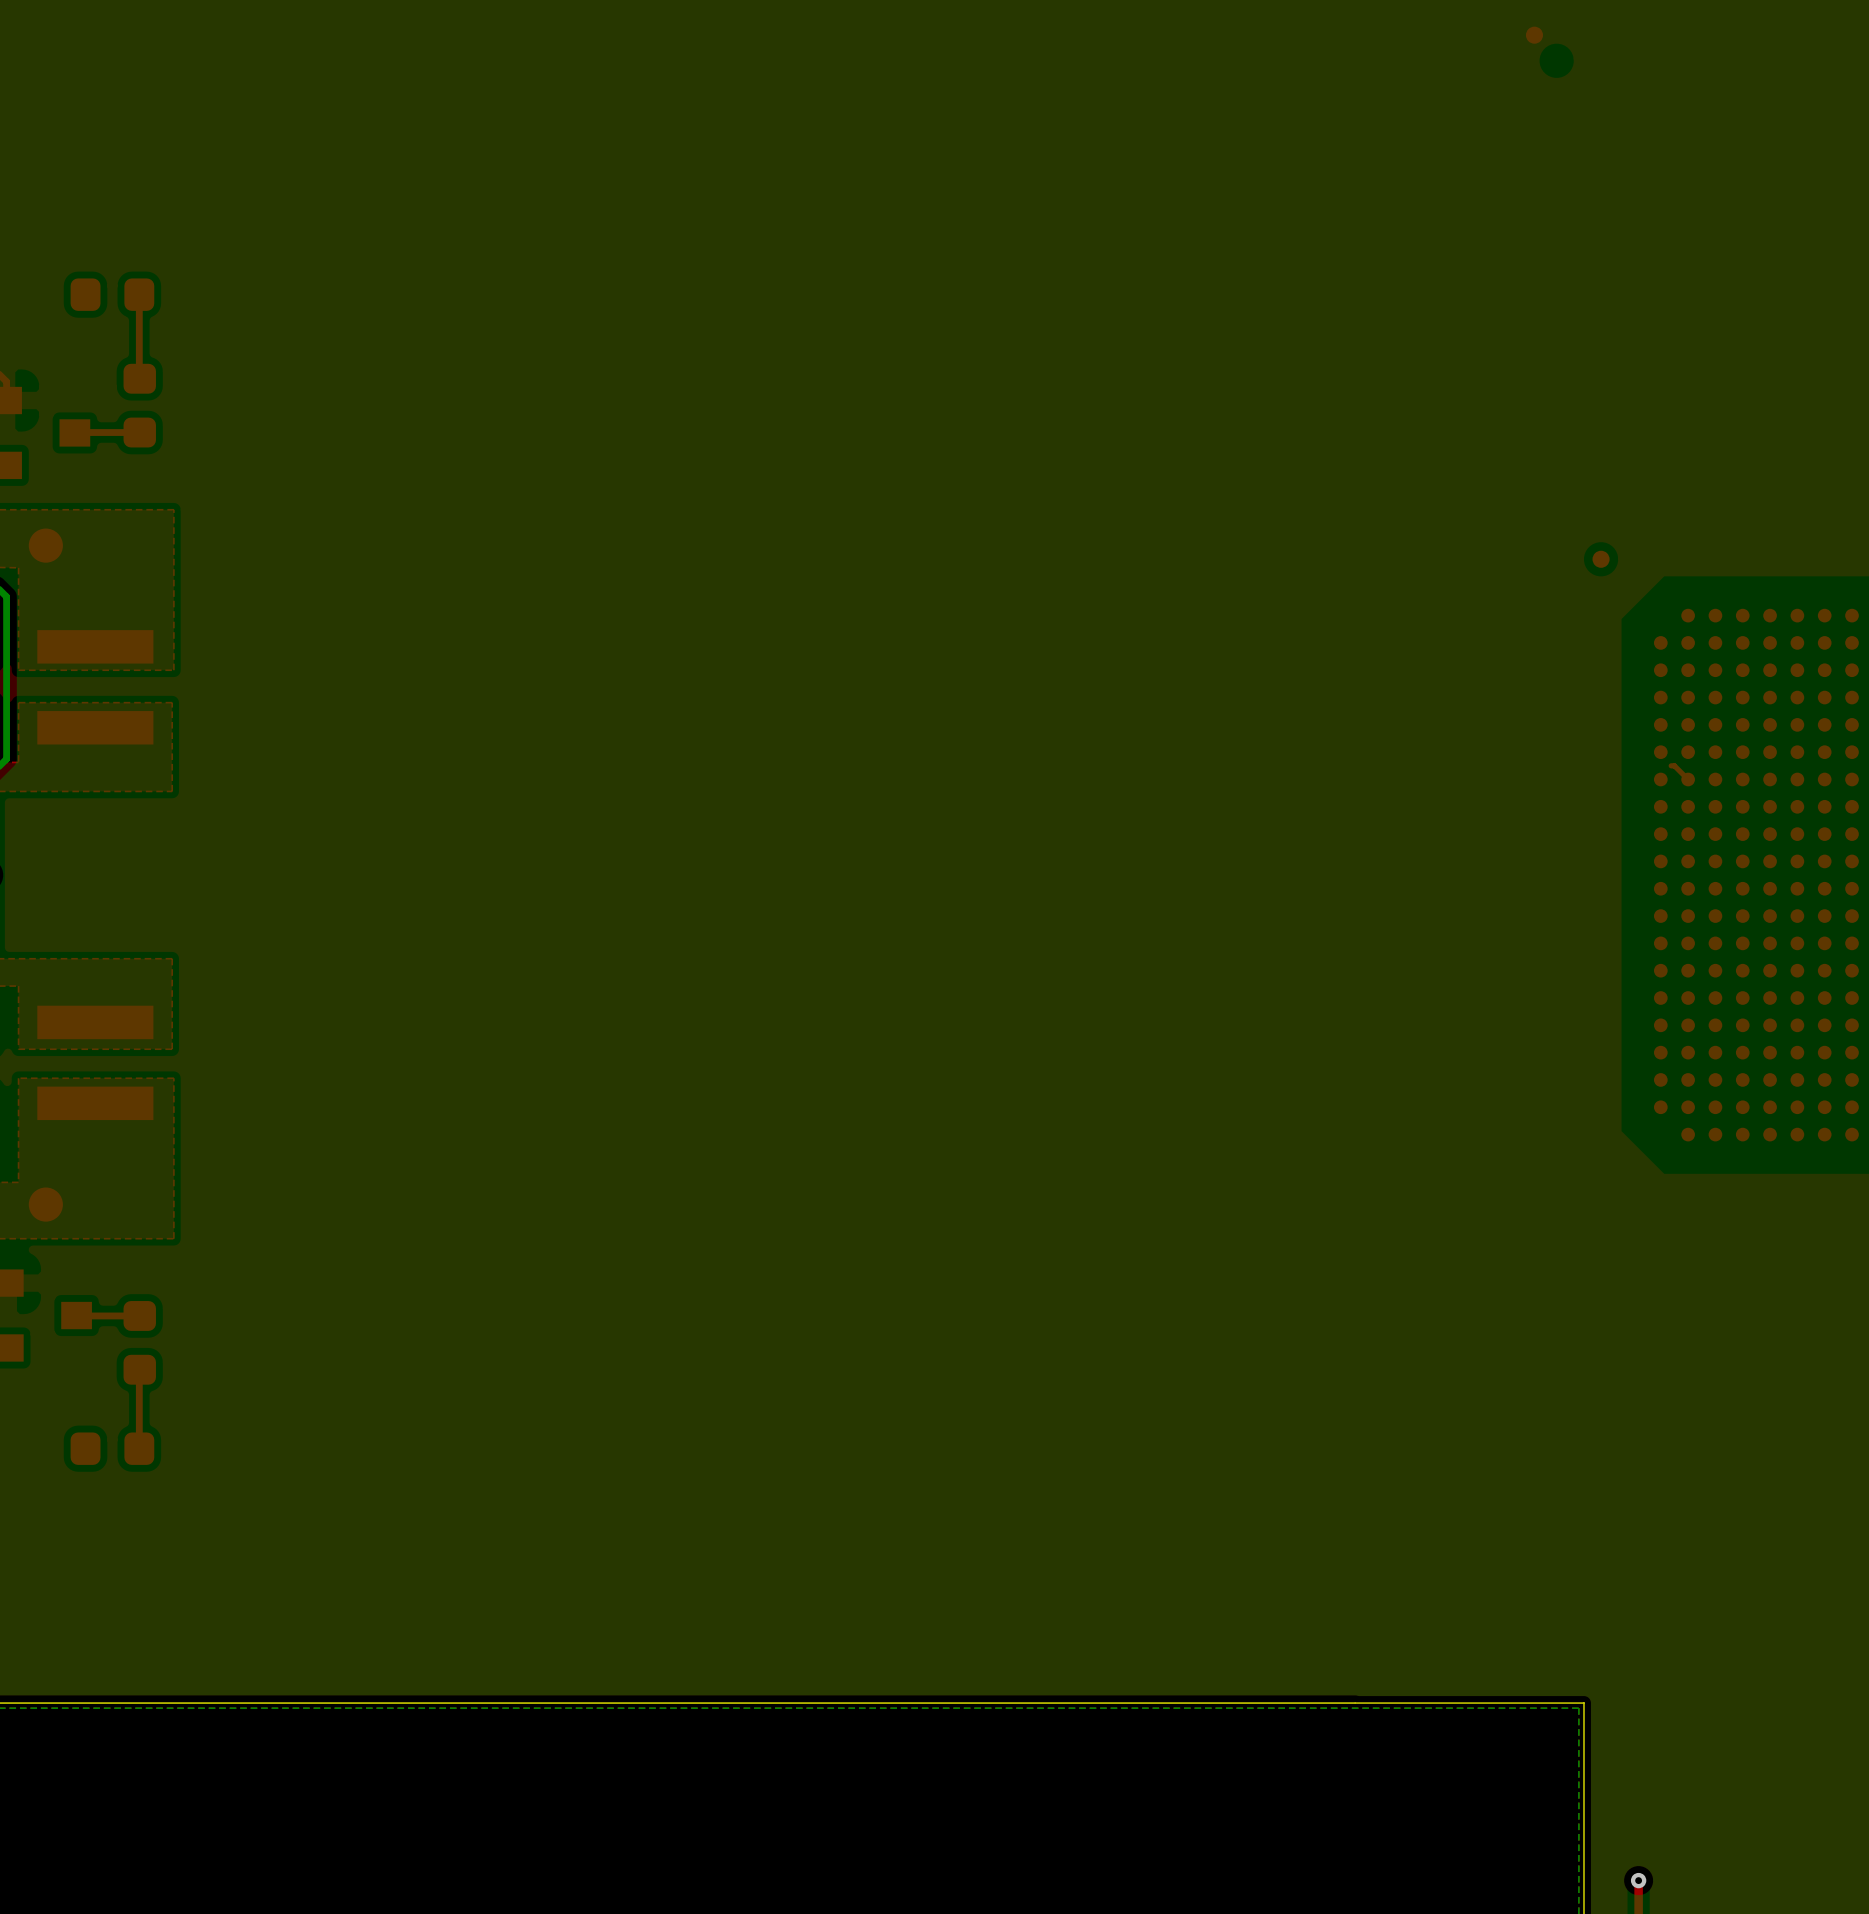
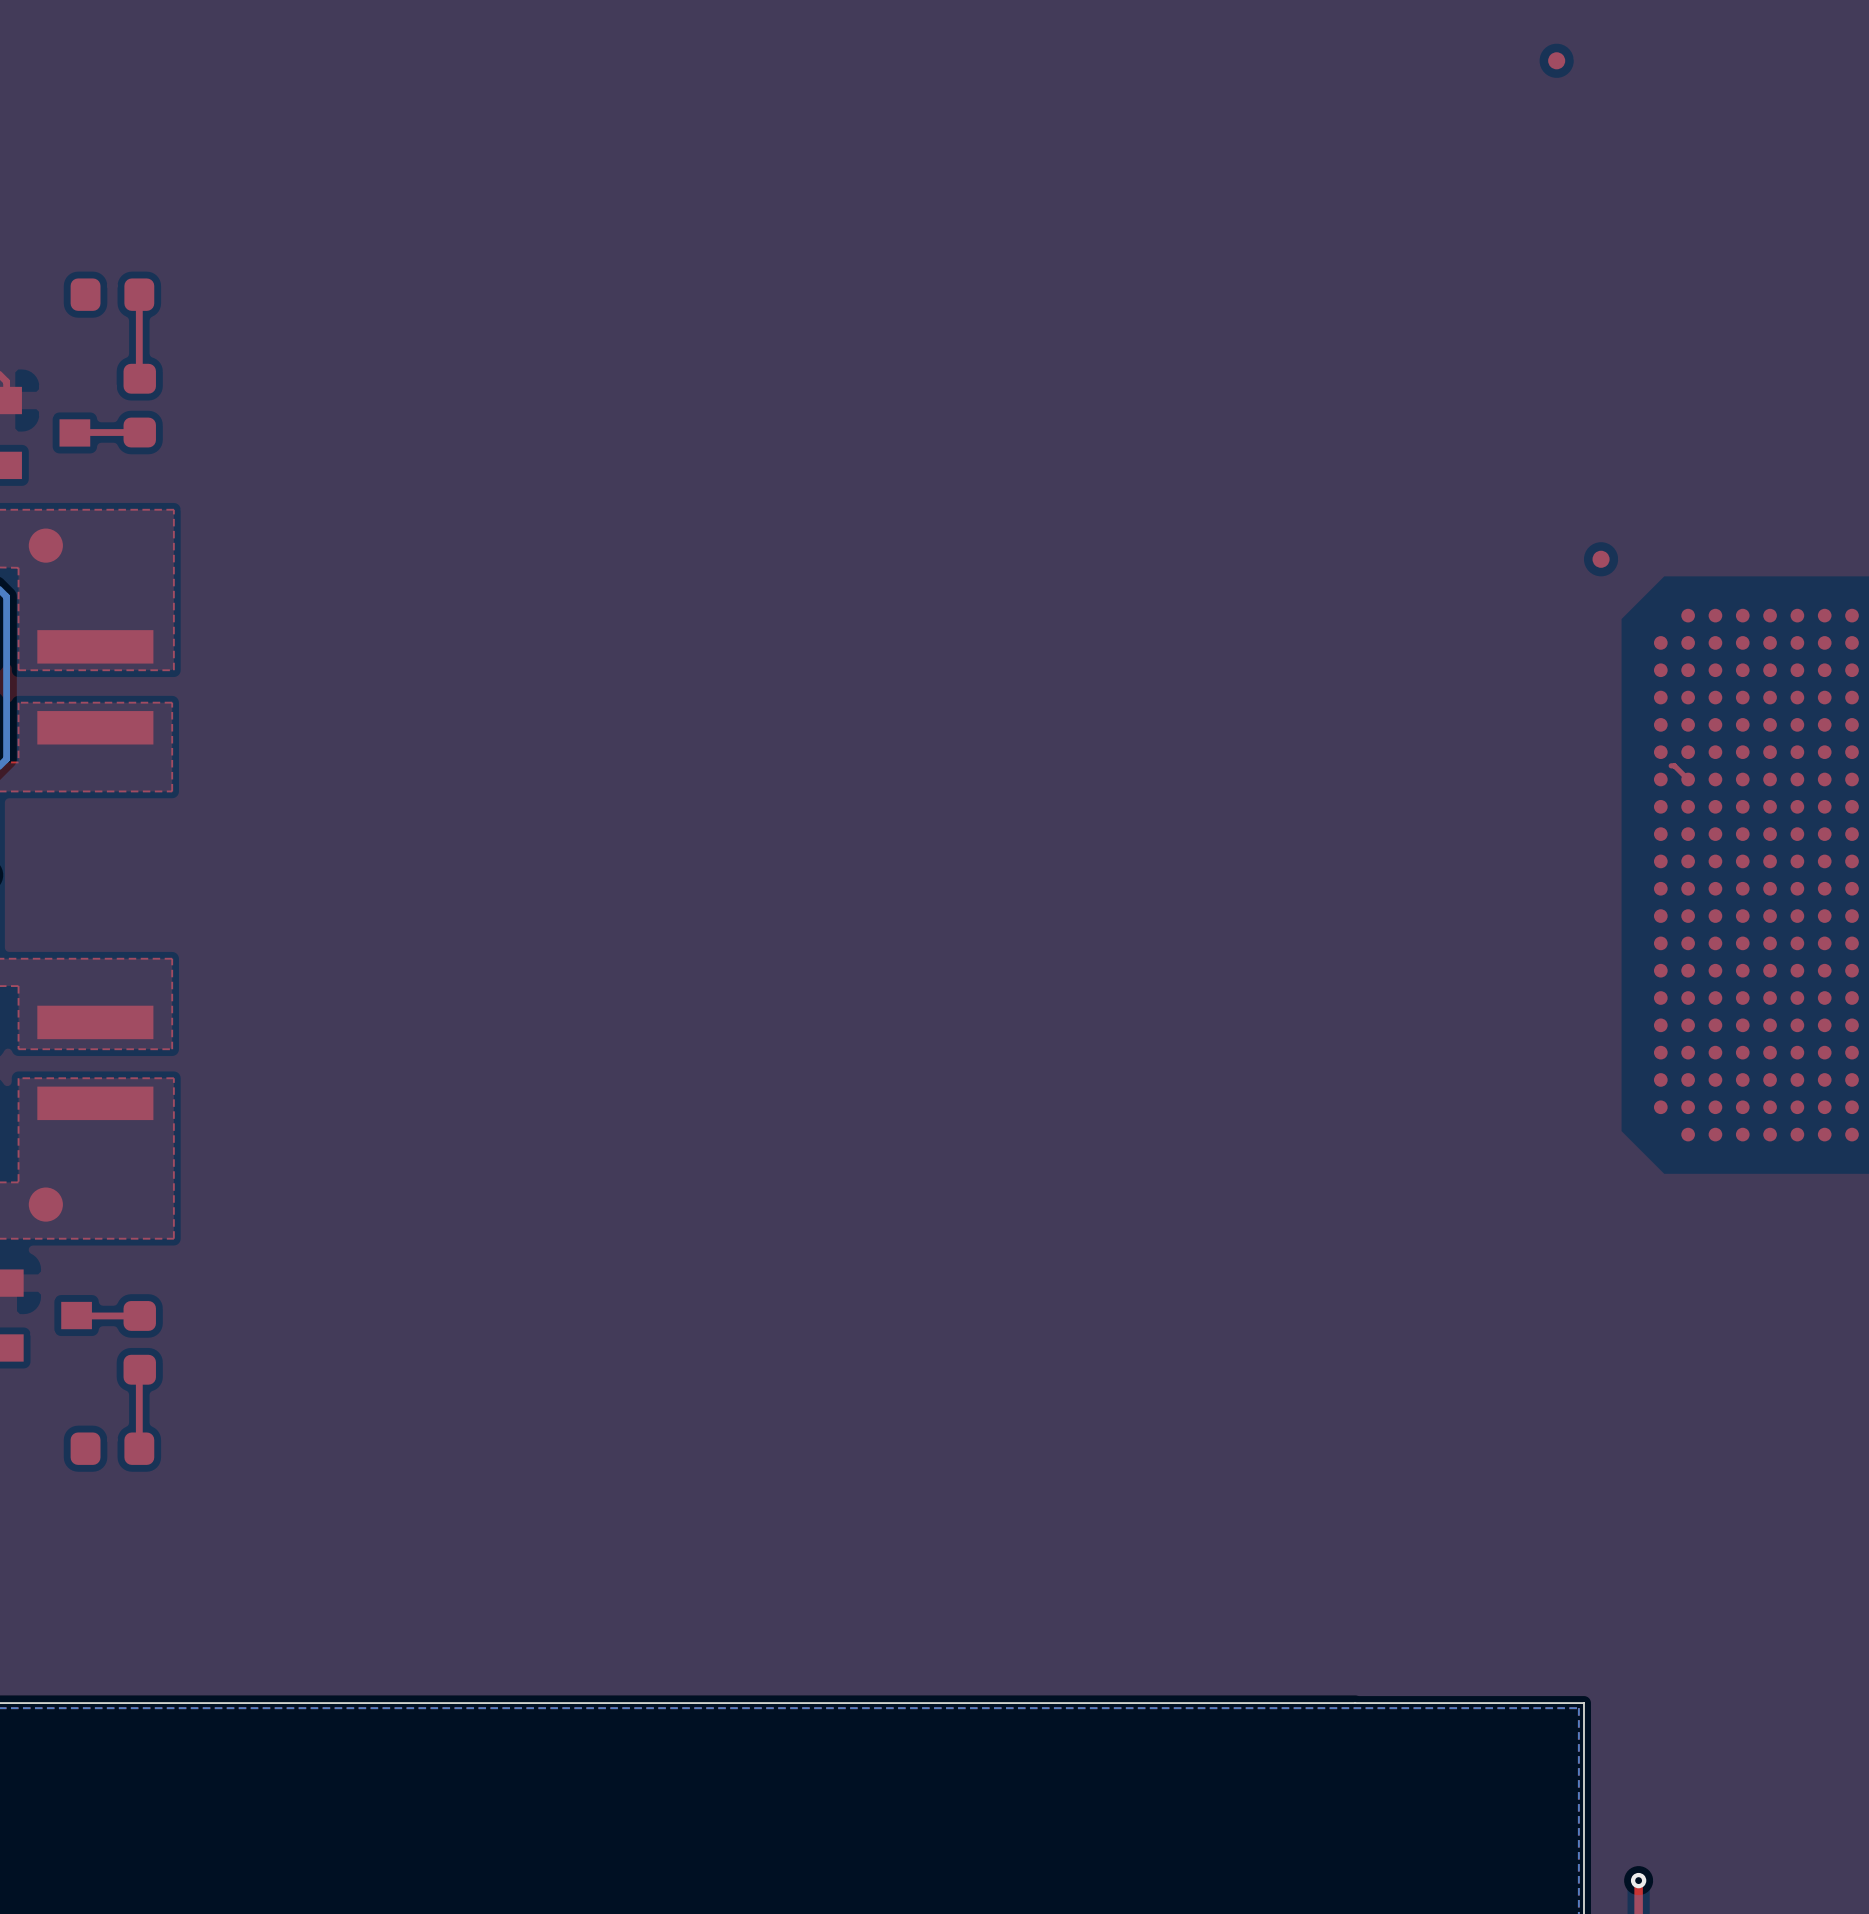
part position: (1534, 35) -> (1556, 60)

